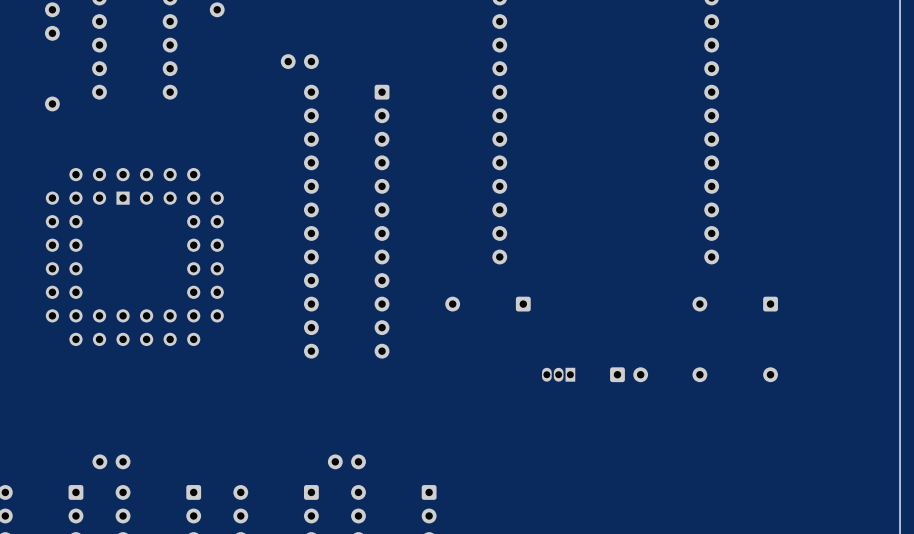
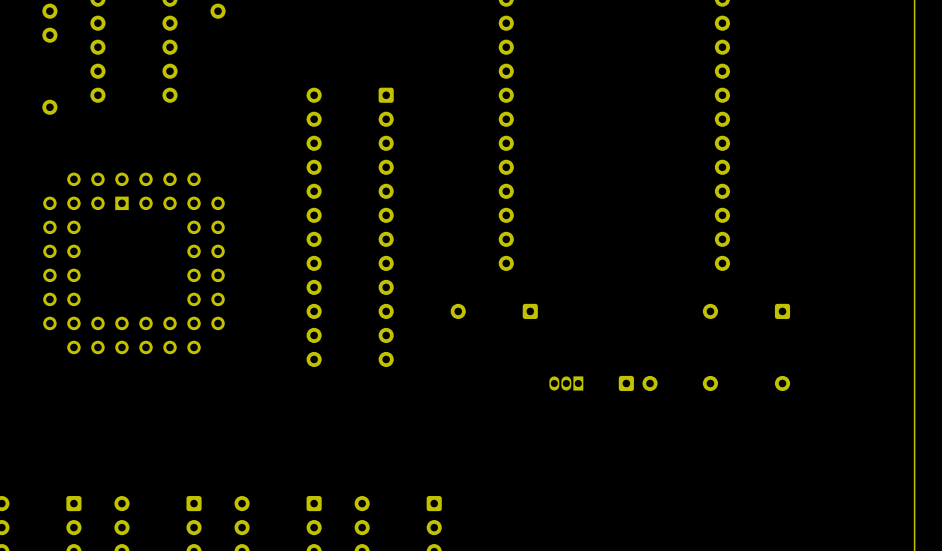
part: (299, 61) -> none
part: (111, 461) -> none
part: (346, 461) -> none

